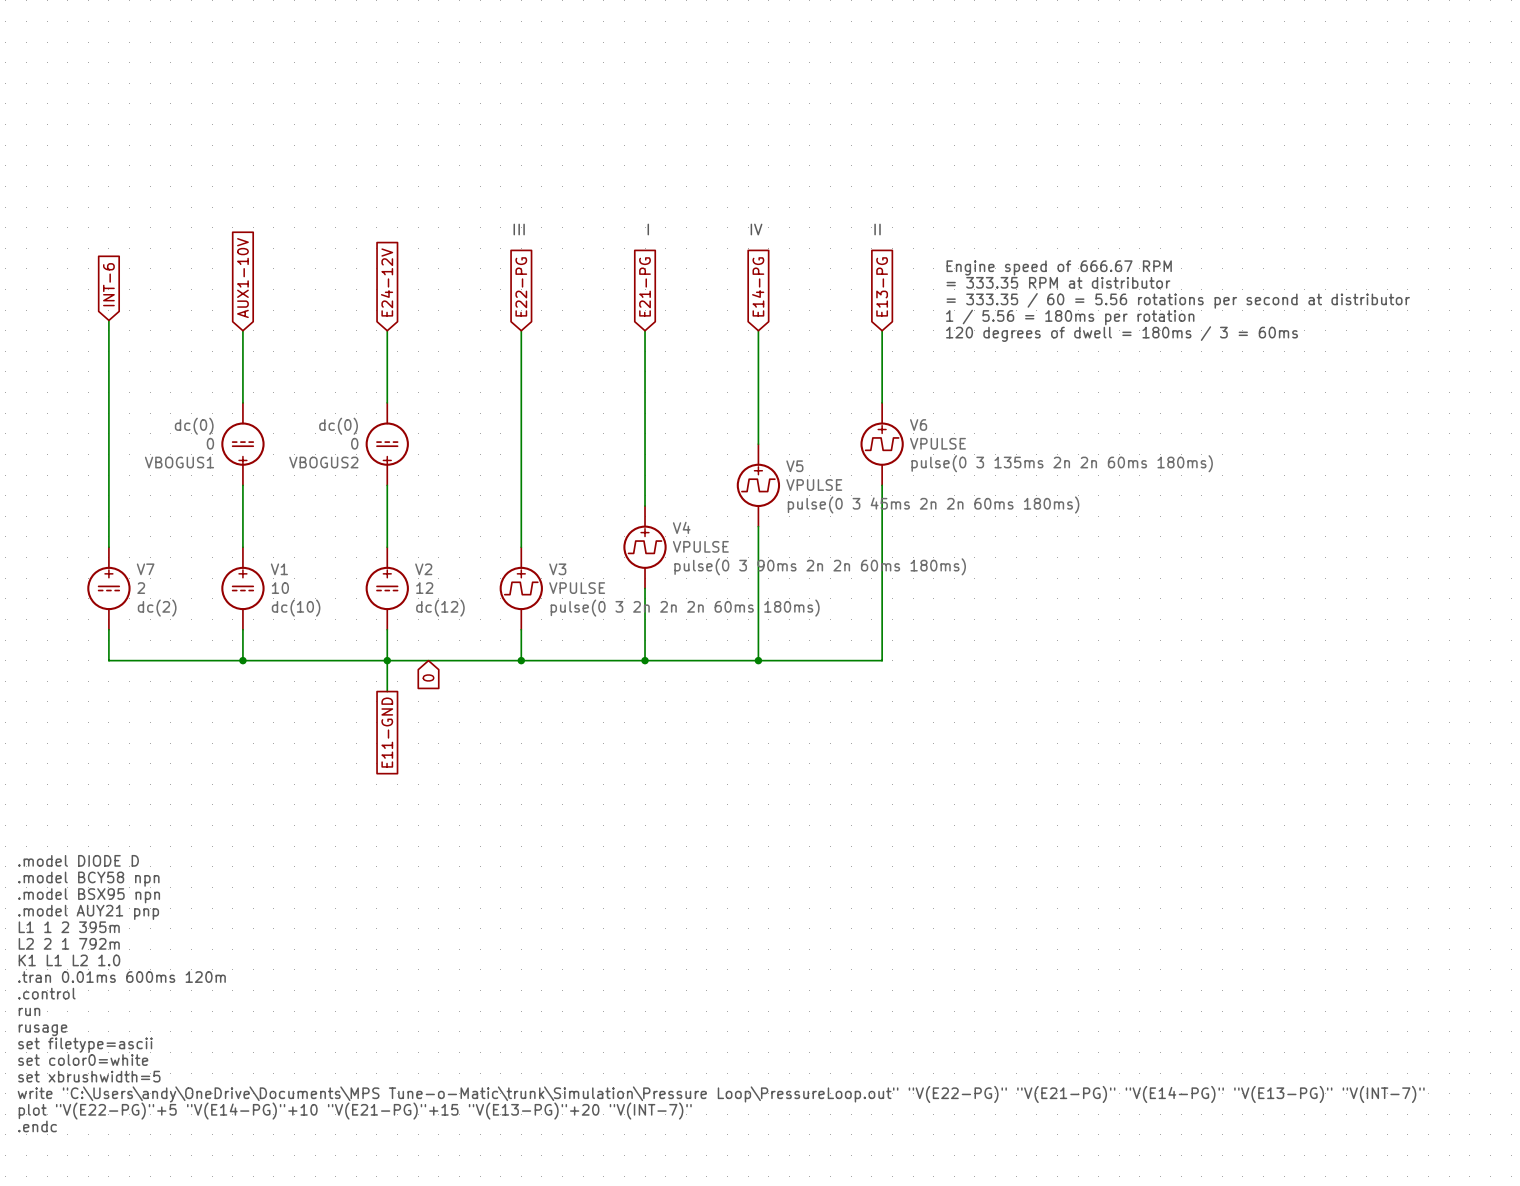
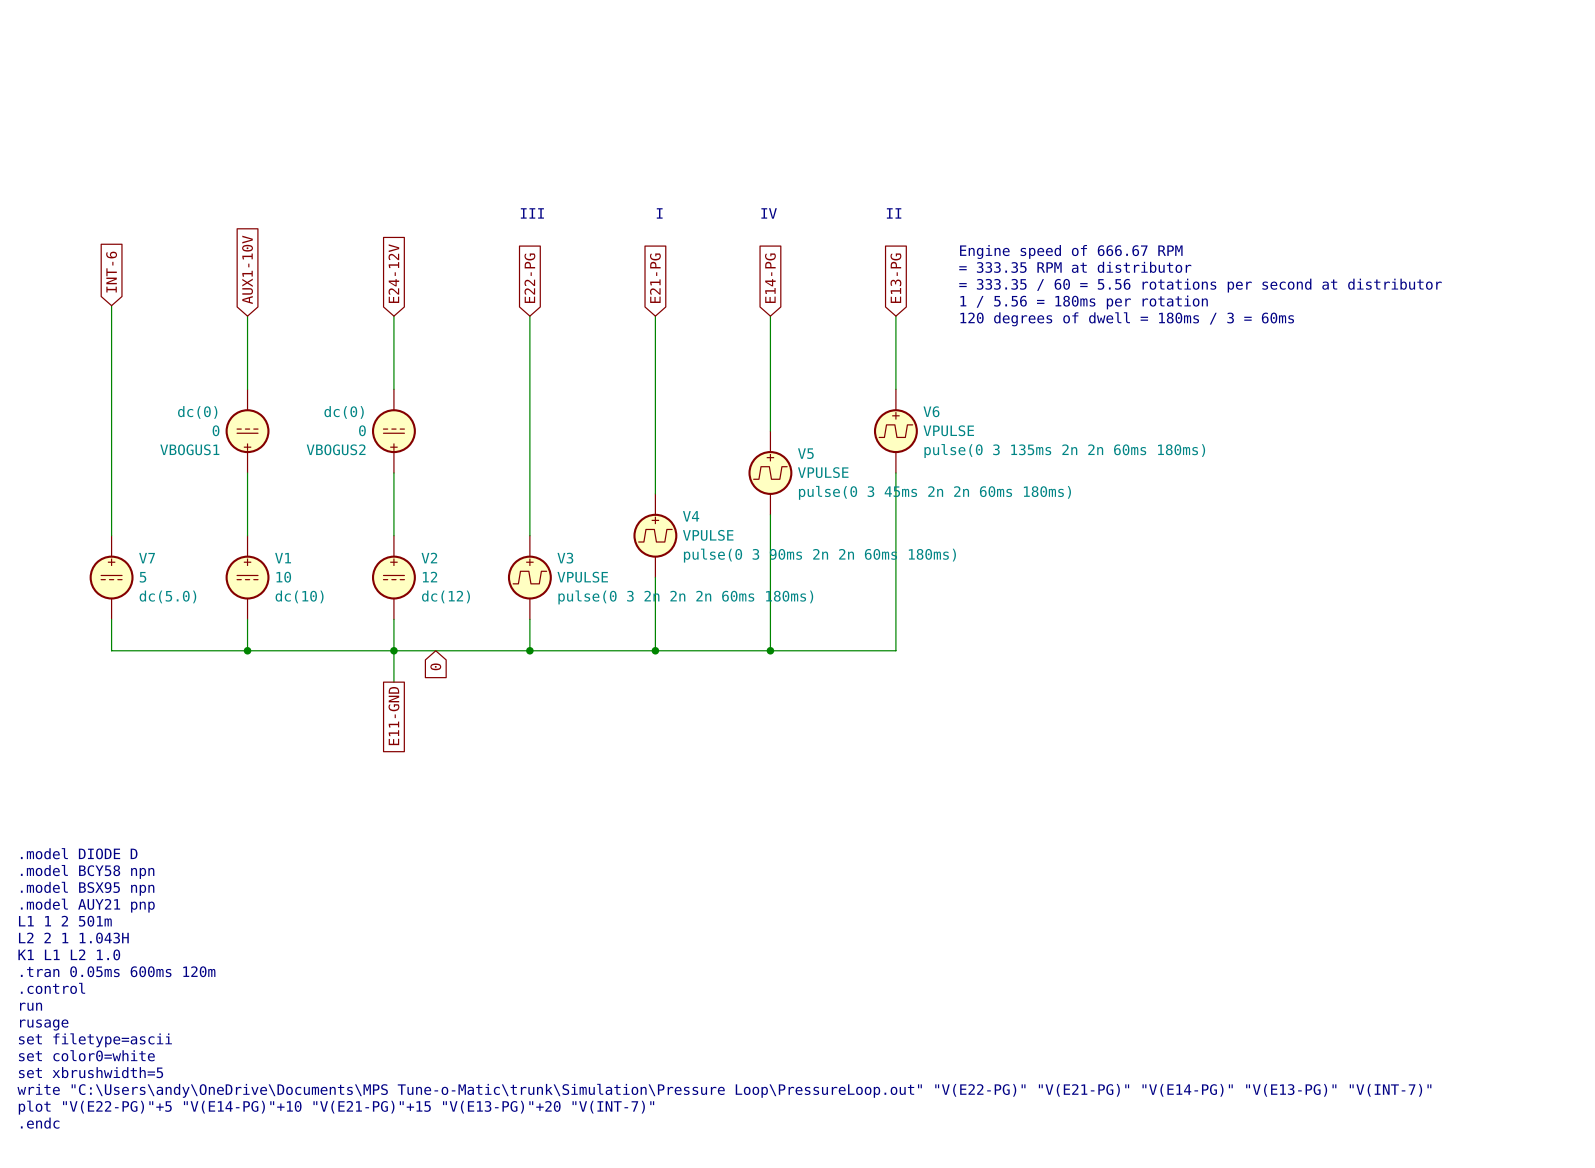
V7 value: 2 (141, 588) -> 5 (143, 577)
V7 text: dc(2) (157, 608) -> dc(5.0) (167, 596)
text: L1 1 2 395m (69, 927) -> L1 1 2 501m (65, 921)
text: L2 2 1 792m (69, 943) -> L2 2 1 1.043H (73, 938)
text: .tran 0.01ms 600ms 120m (122, 977) -> .tran 0.05ms 600ms 120m (118, 971)

